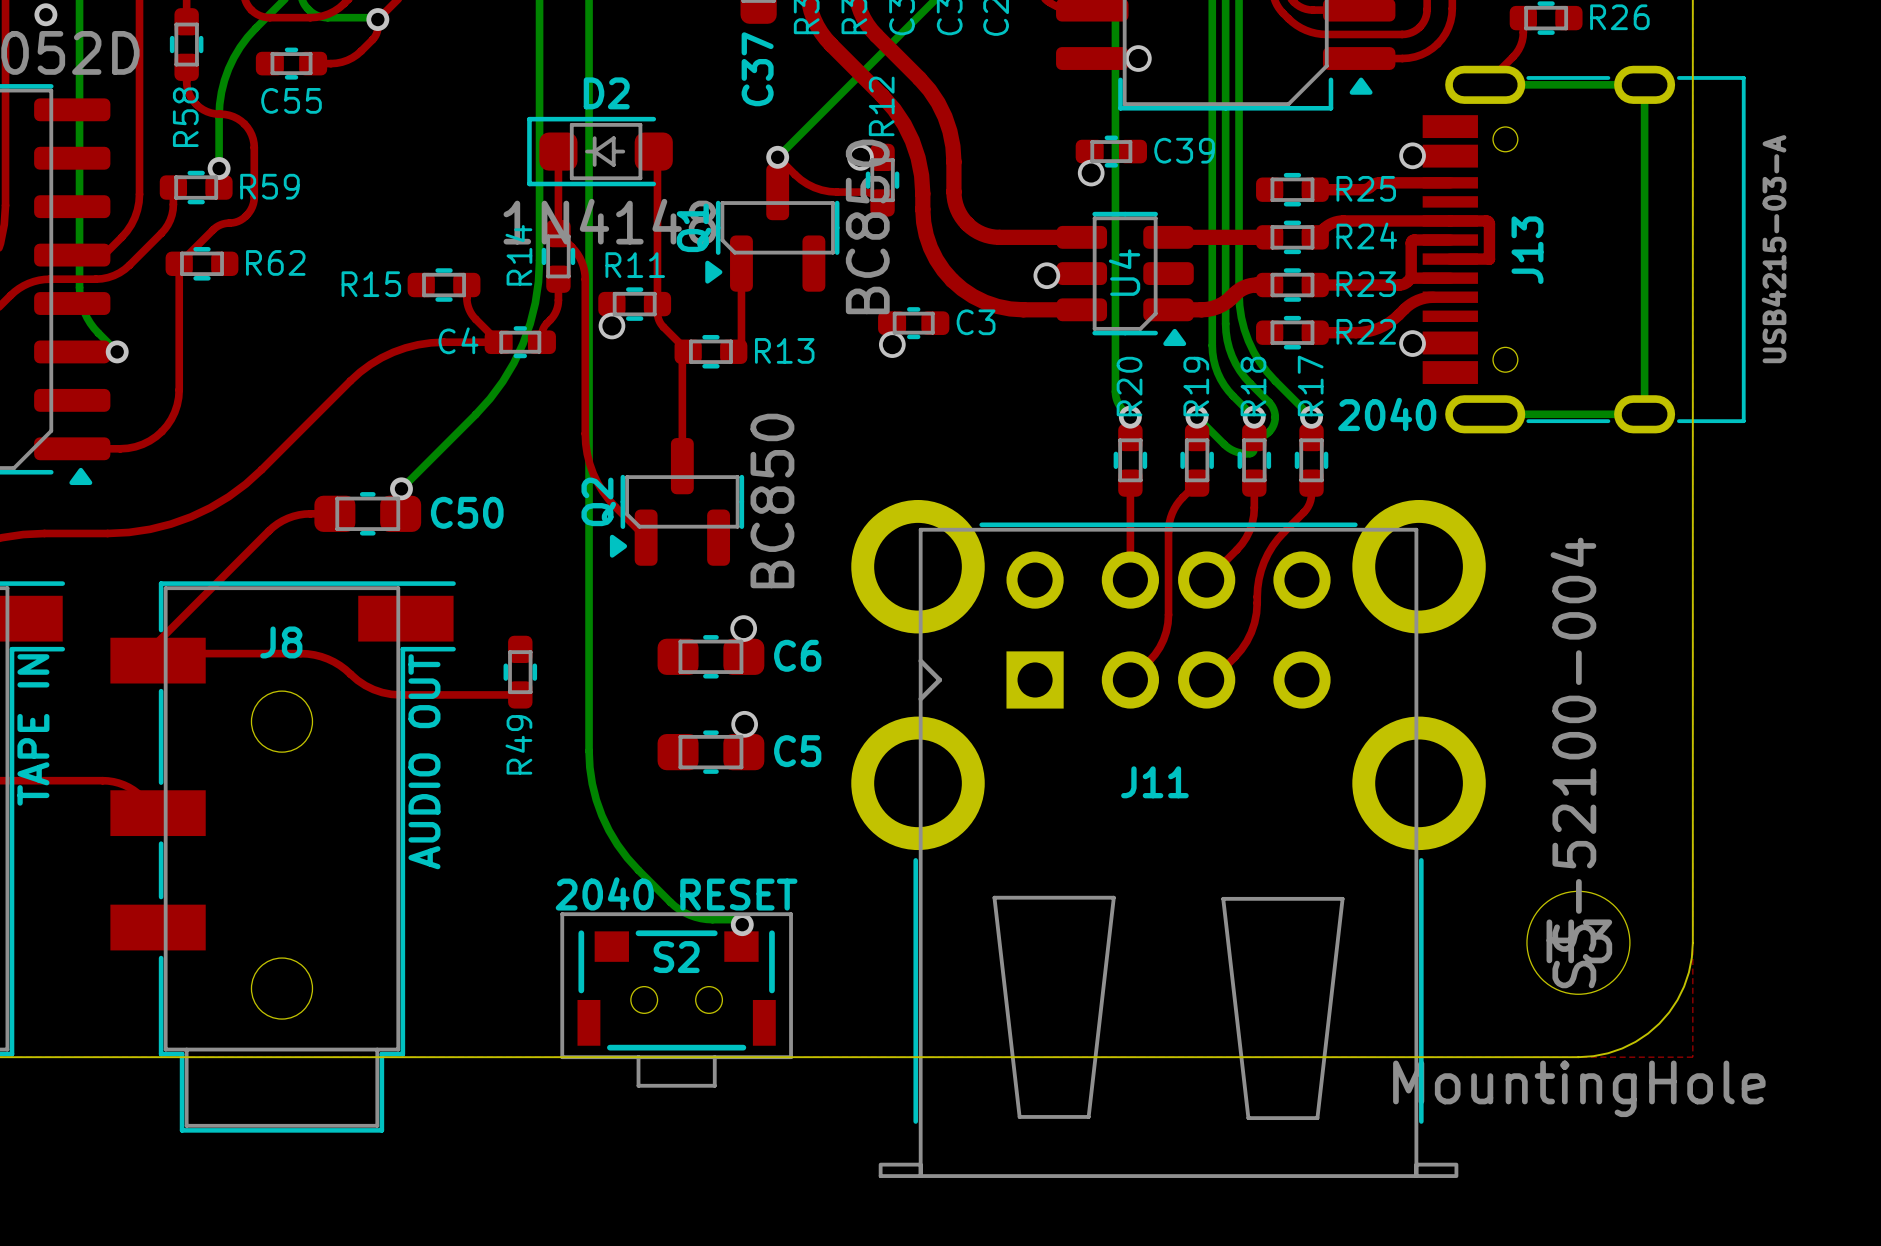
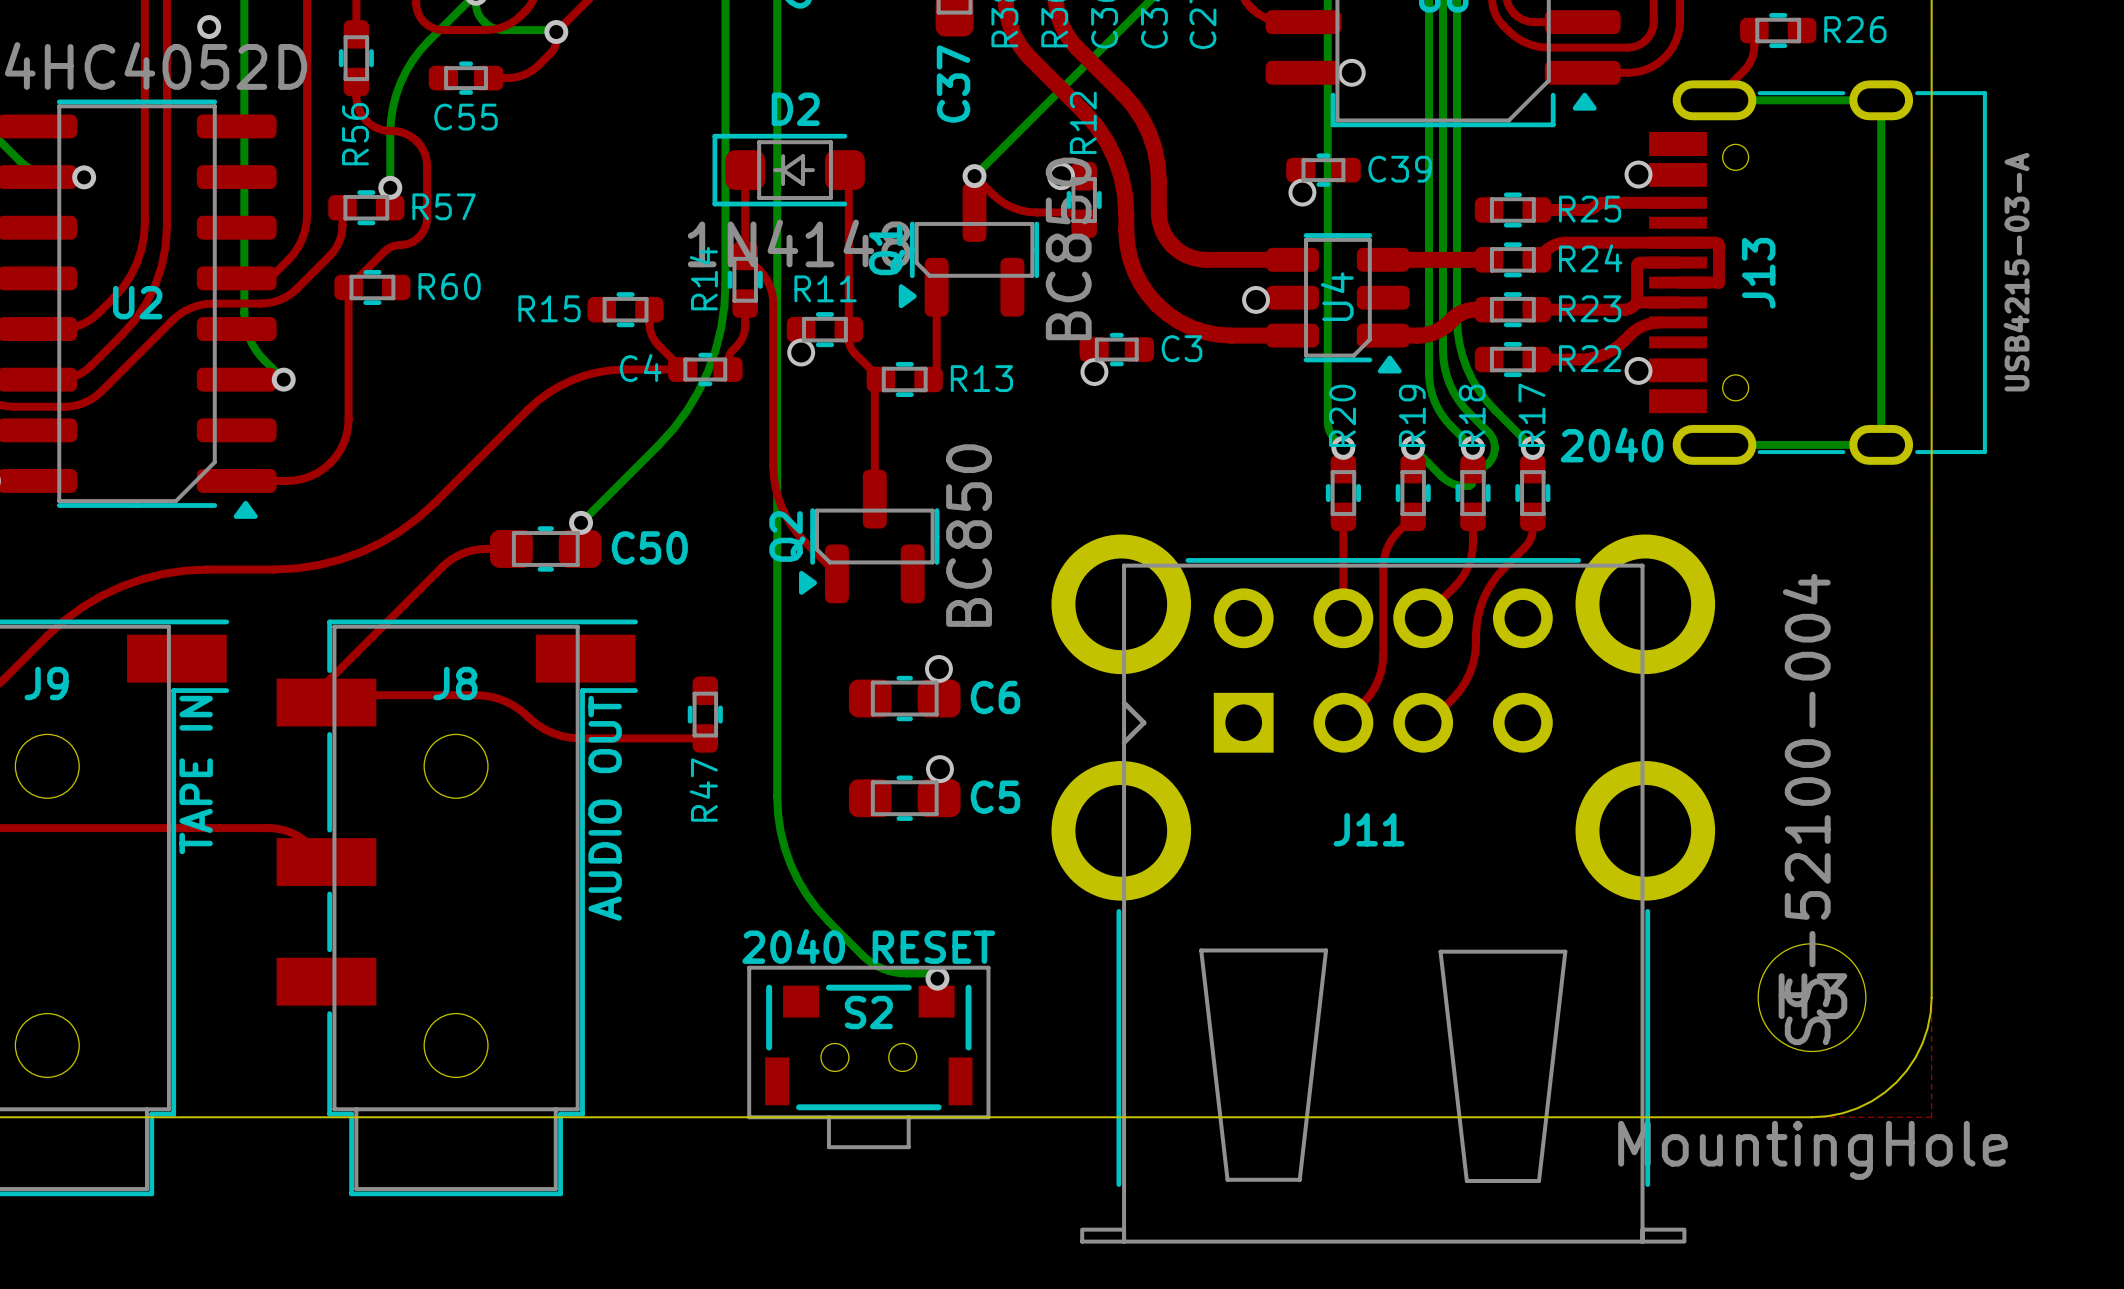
R58 name: R58 (185, 117) -> R56 (355, 134)
R59 name: R59 (269, 186) -> R57 (444, 206)
R62 name: R62 (275, 262) -> R60 (449, 286)
R49 name: R49 (518, 744) -> R47 (703, 790)

